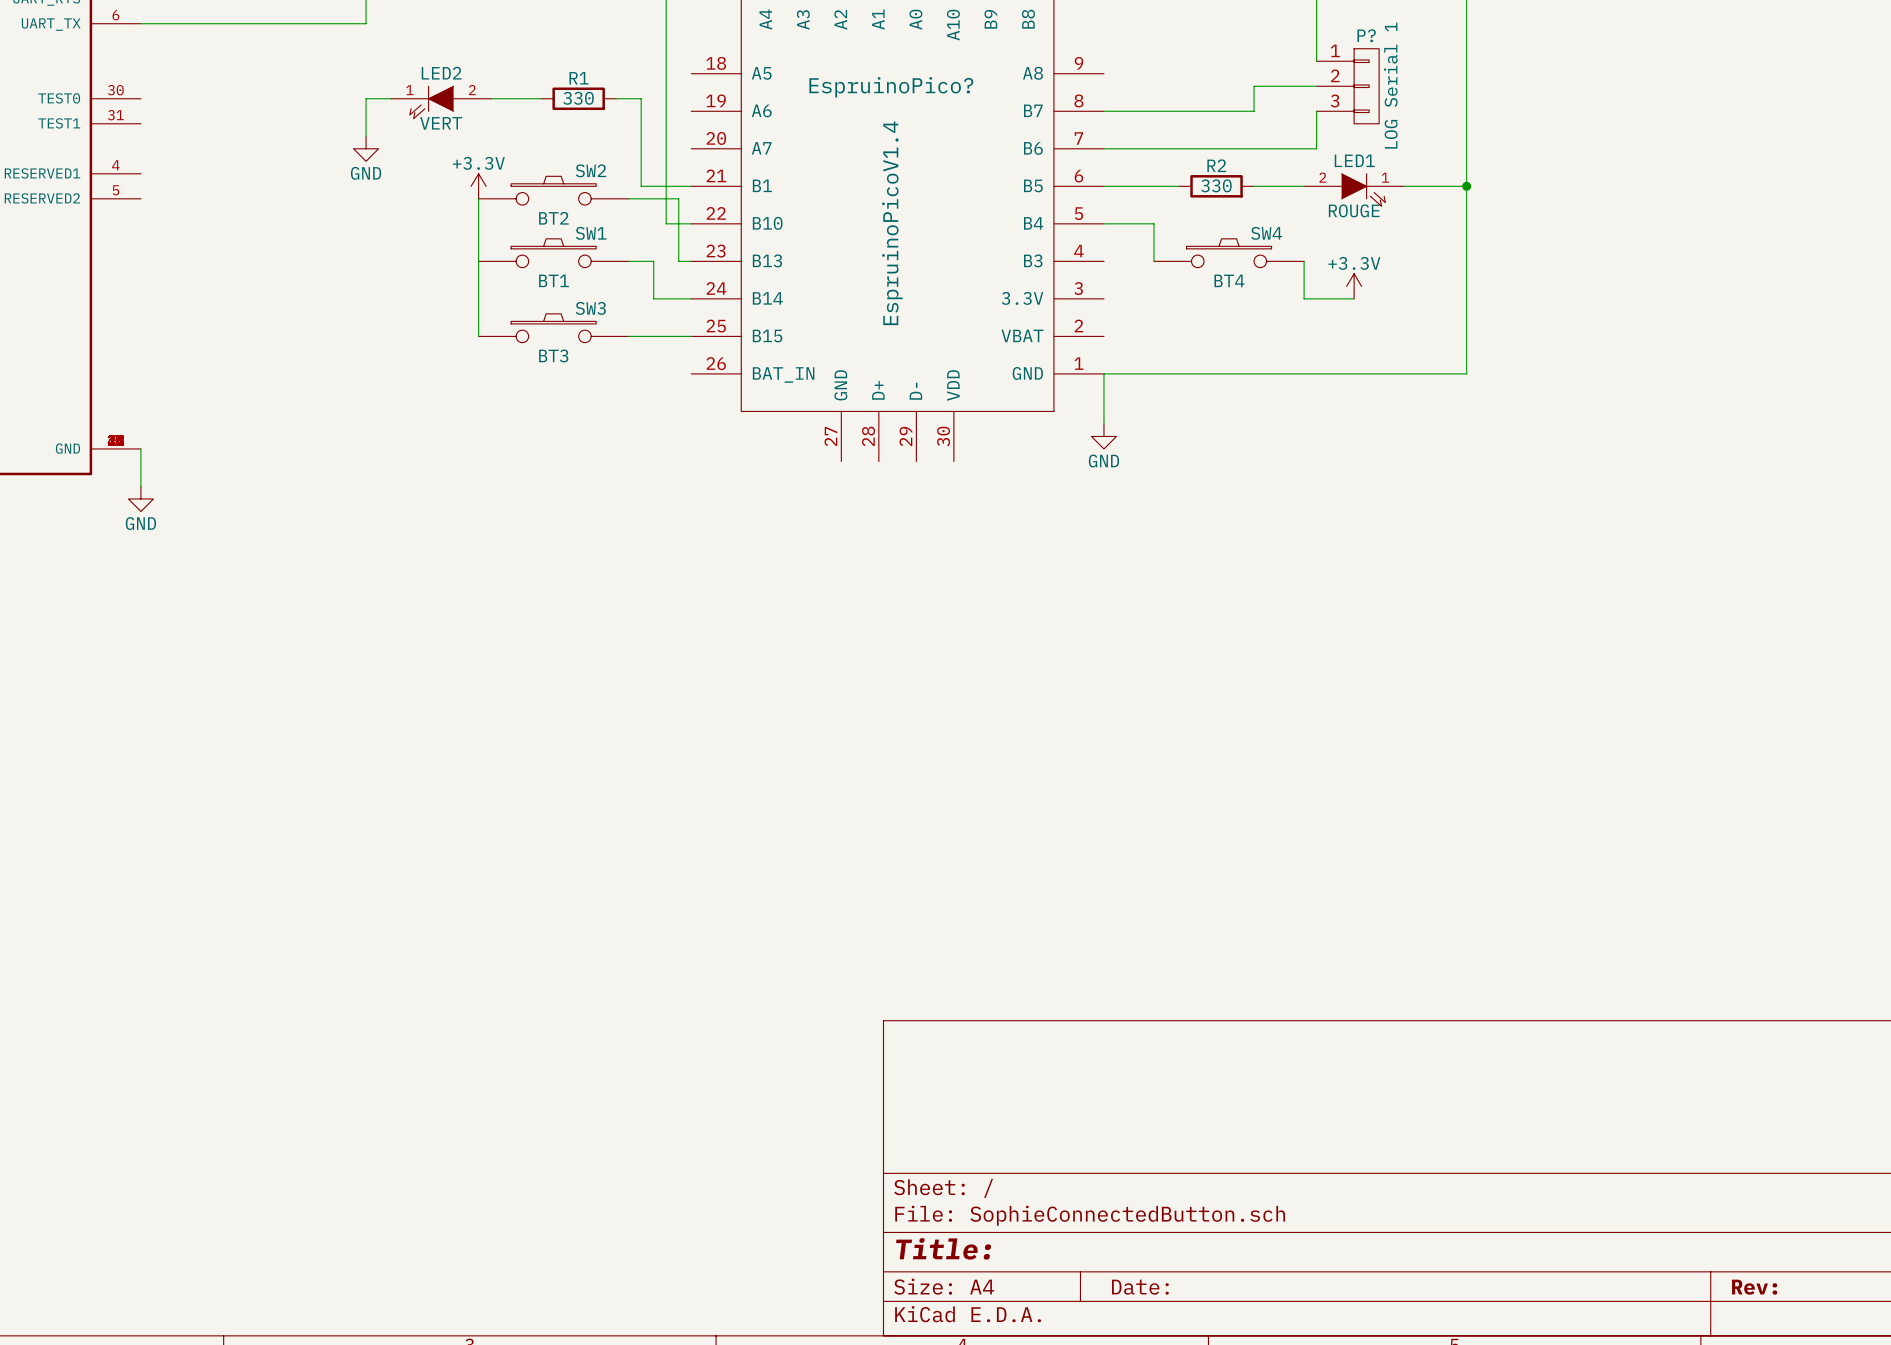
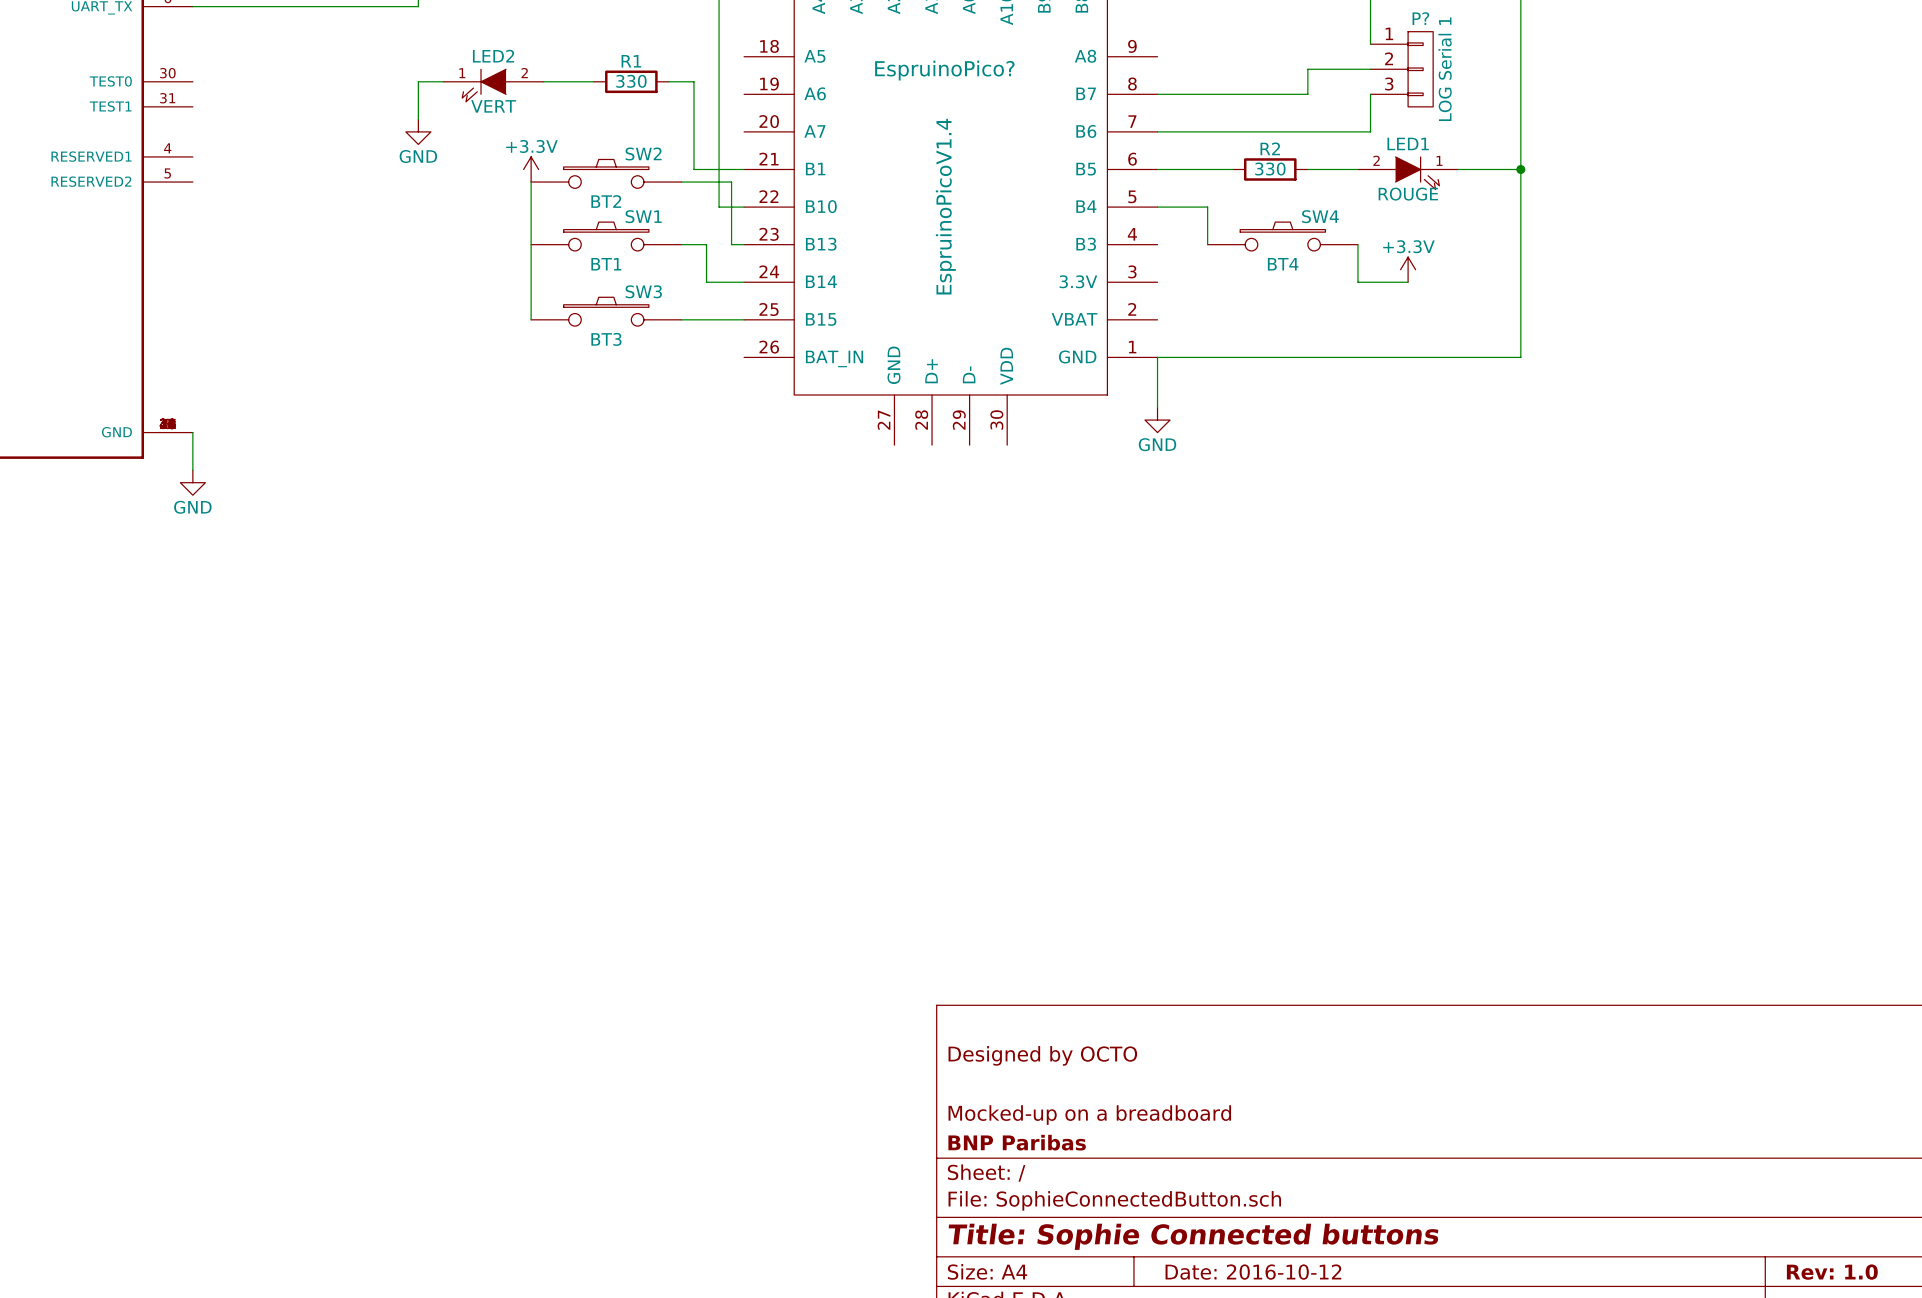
title block: none -> Designed by OCTO (1042, 1055)
title block: none -> Mocked-up on a breadboard (1089, 1115)
title block: none -> BNP Paribas (1017, 1142)
title block: Title: (943, 1248) -> Title: Sophie Connected buttons (1193, 1236)
title block: Date: (1140, 1287) -> Date: 2016-10-12 (1253, 1272)
title block: Rev: (1754, 1287) -> Rev: 1.0 (1832, 1272)

